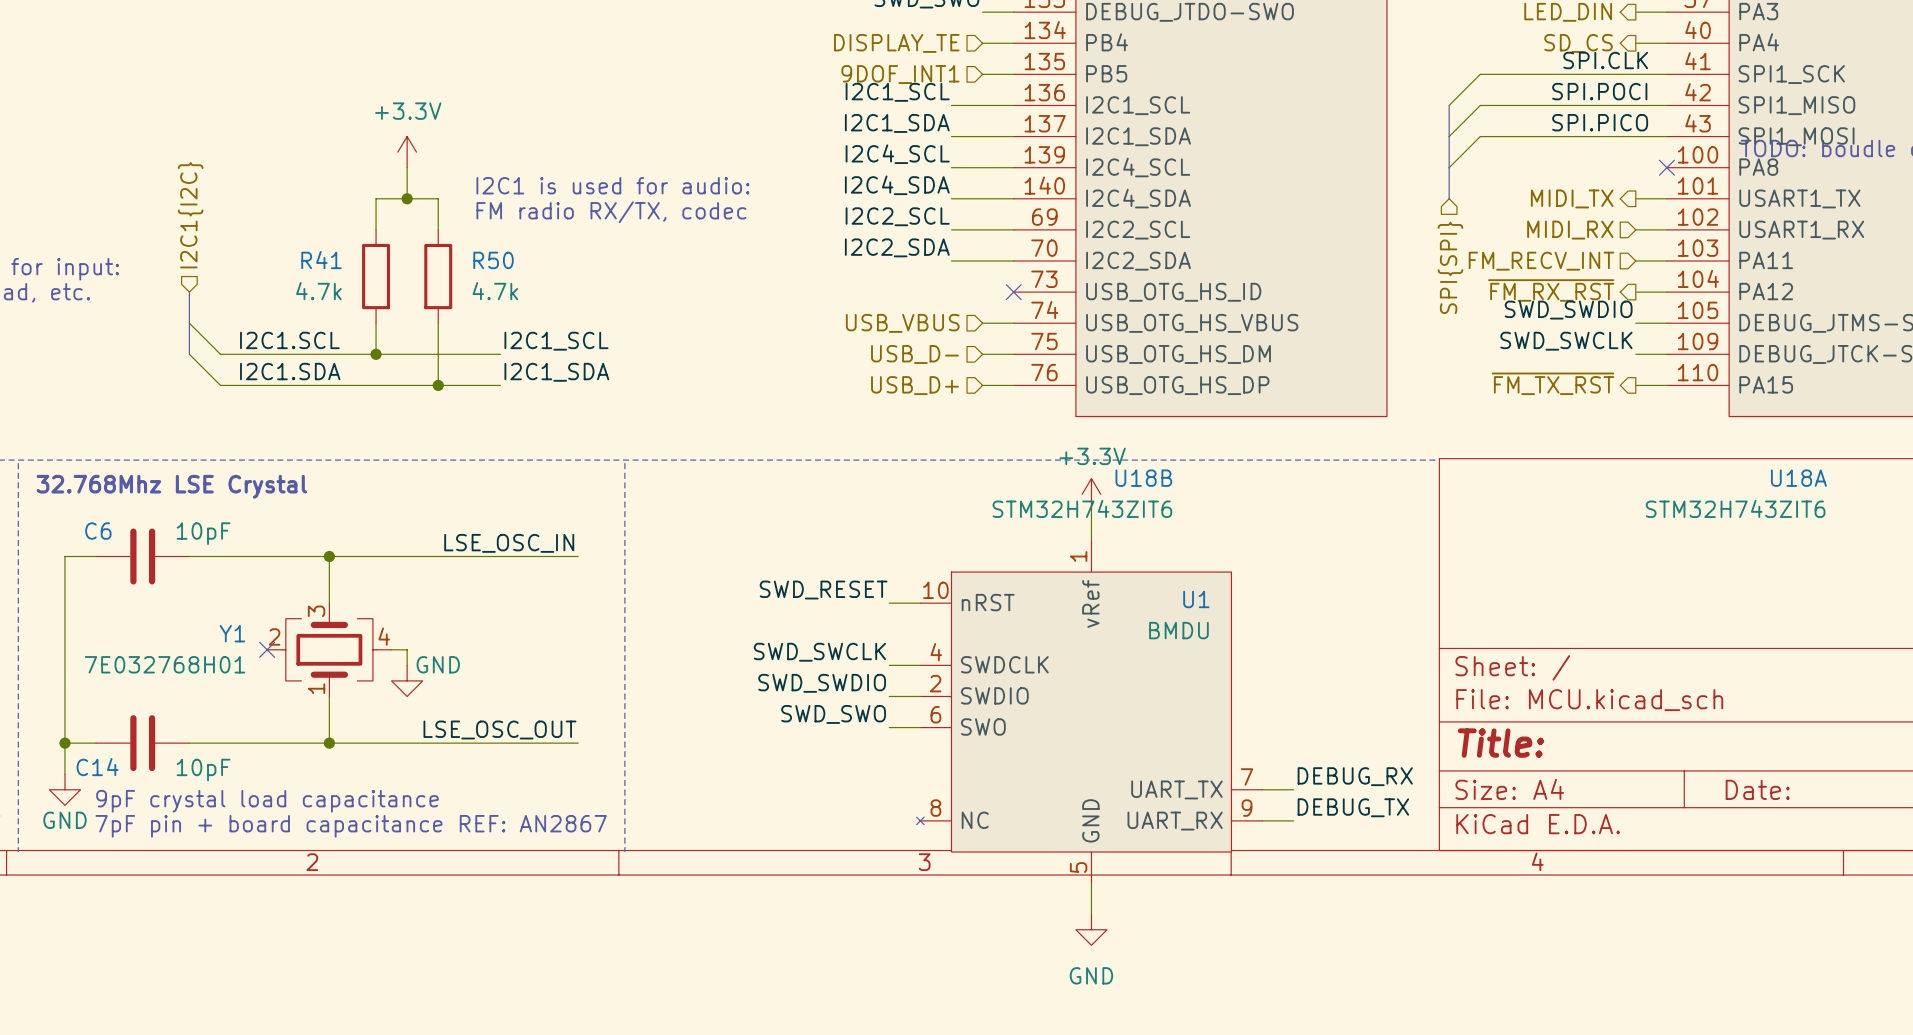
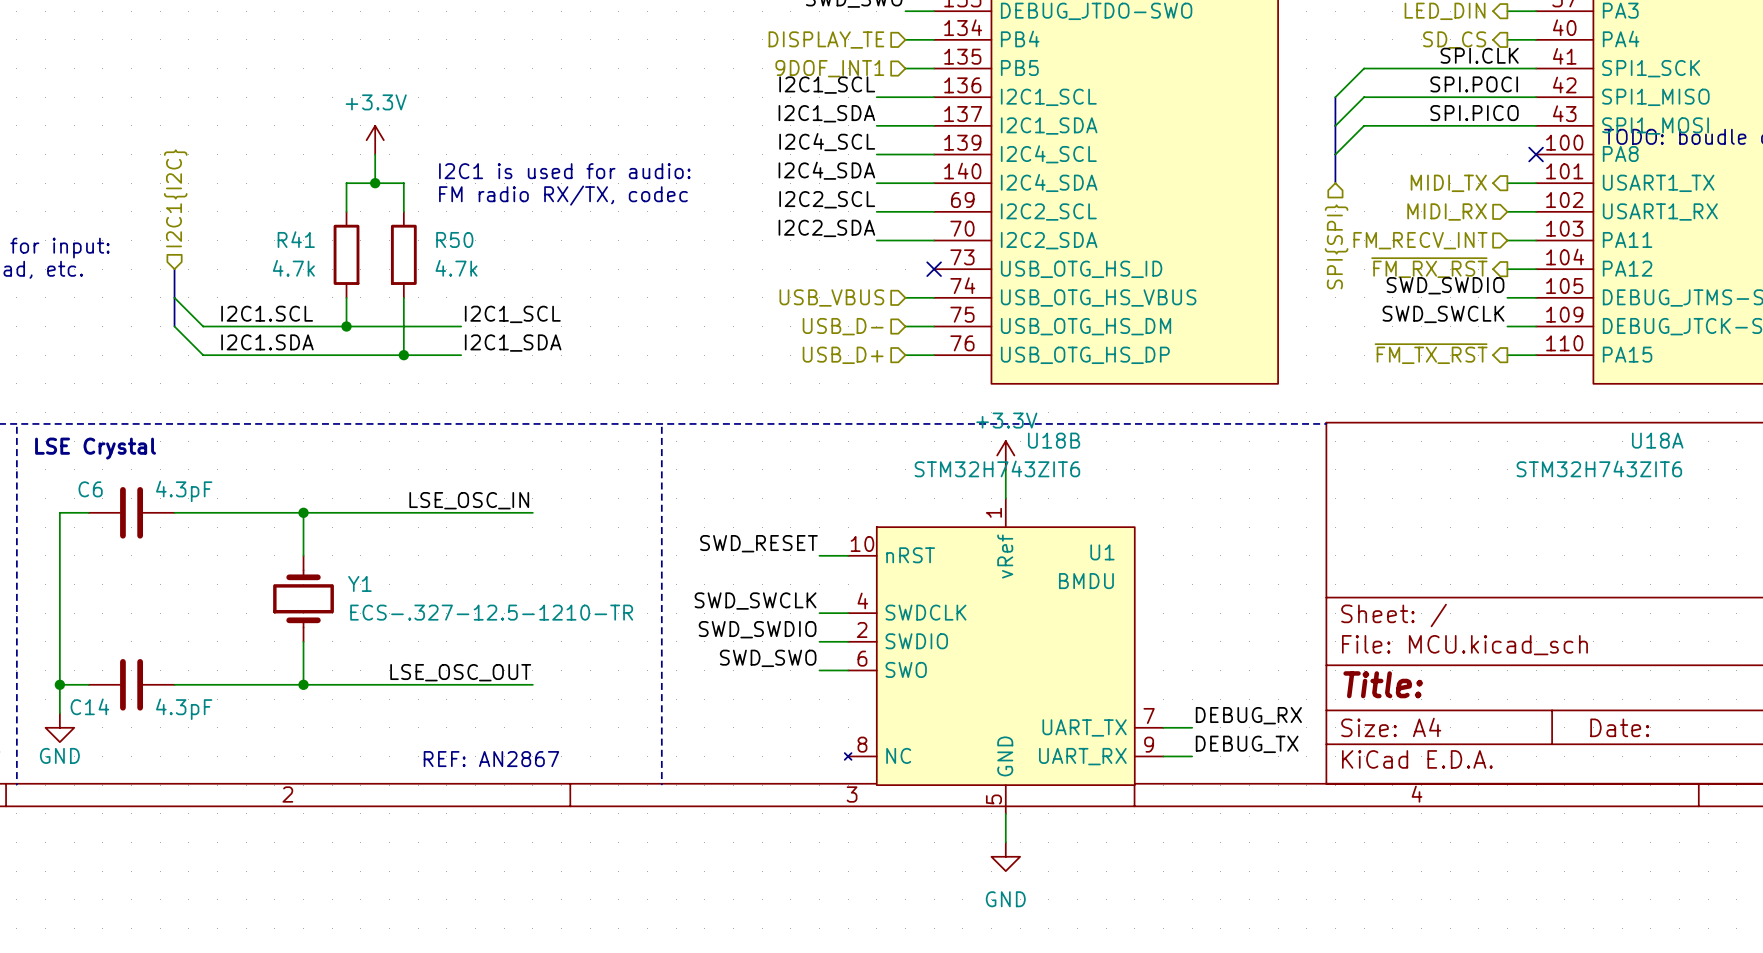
line: (624, 463) (624, 852) -> (661, 426) (661, 785)
text: 32.768Mhz LSE Crystal (171, 486) -> LSE Crystal (95, 448)
C6 value: 10pF (203, 533) -> 4.3pF (184, 491)
Y1 symbol: [267, 603, 392, 697] -> [273, 555, 334, 642]
Y1 name position: Y1 (232, 633) -> Y1 (359, 583)
no-connect mark: (267, 649) -> none
wire: (391, 649) (407, 649) (407, 665) -> none
Y1 value: 7E032768H01 (165, 664) -> ECS-.327-12.5-1210-TR (491, 612)
power symbol: GND (407, 680) -> none
C14 value: 10pF (203, 770) -> 4.3pF (184, 709)
text: 9pF crystal load capacitance (267, 801) -> none
text: 7pF pin + board capacitance (268, 826) -> none

